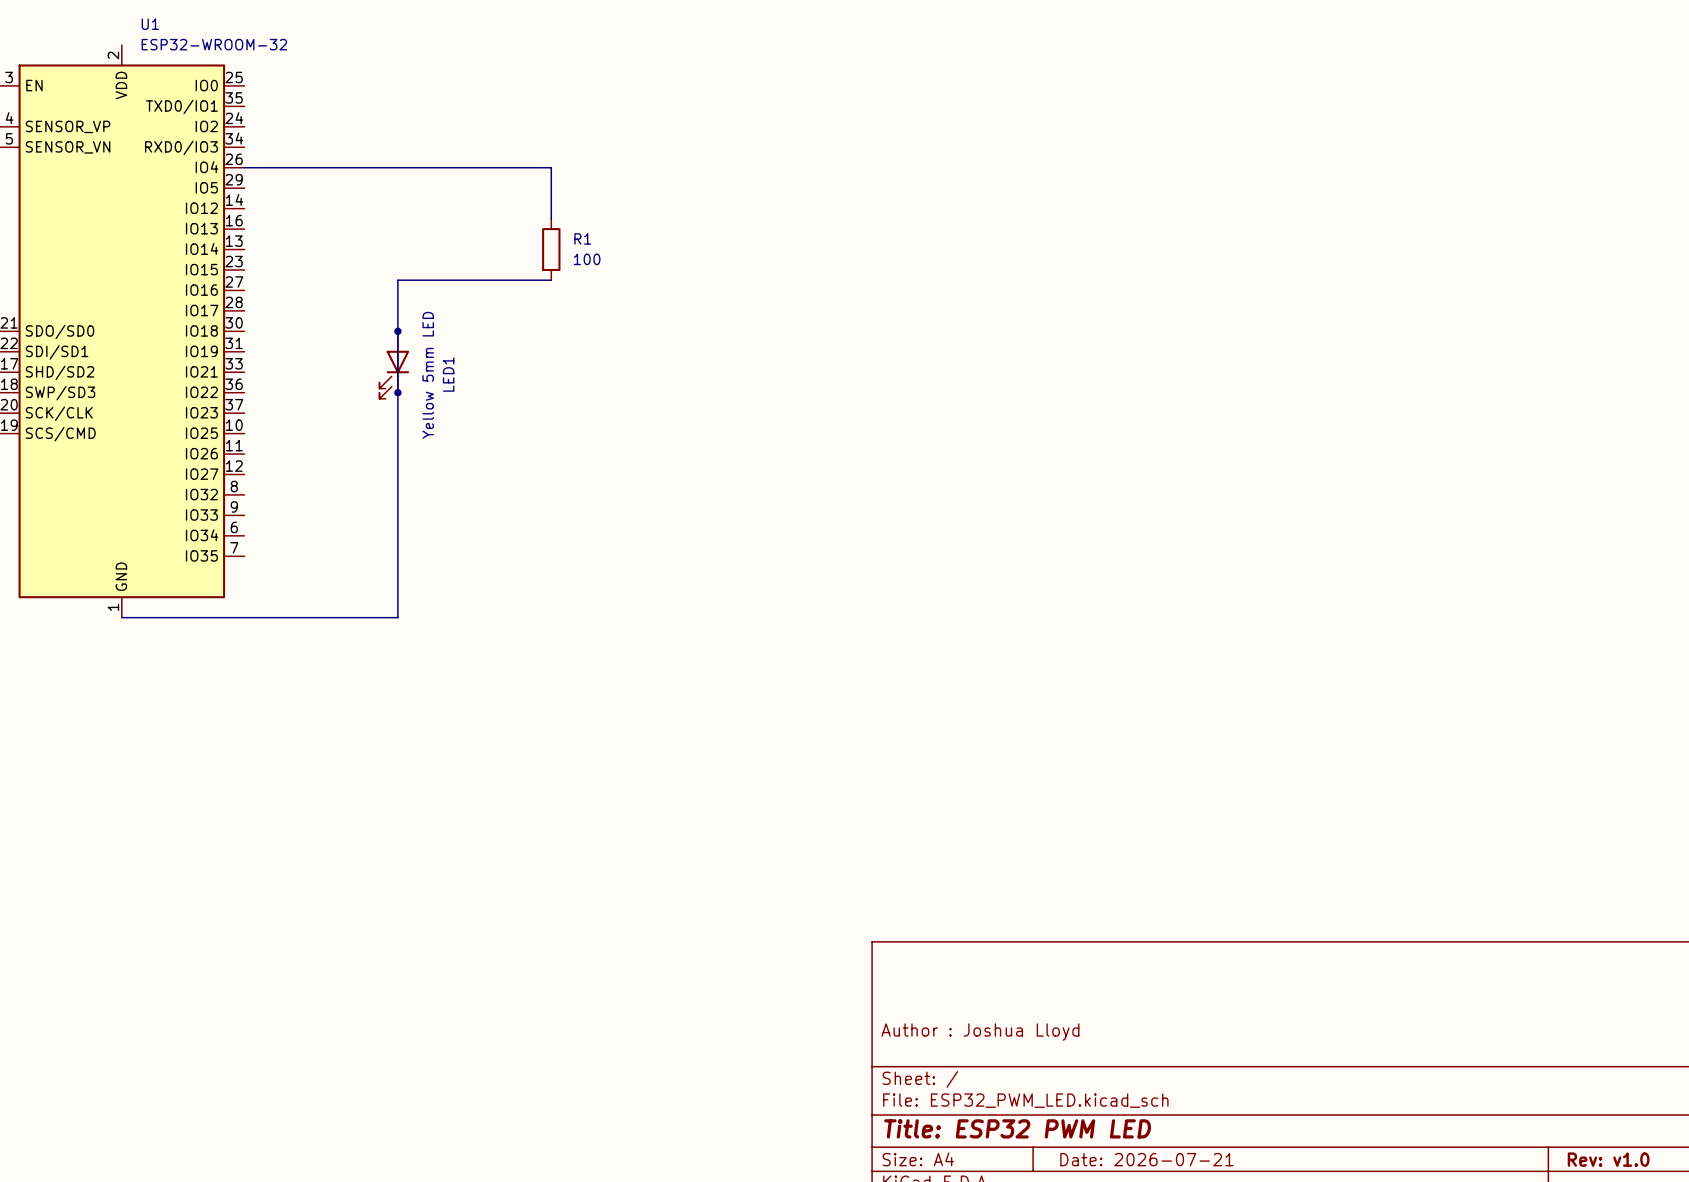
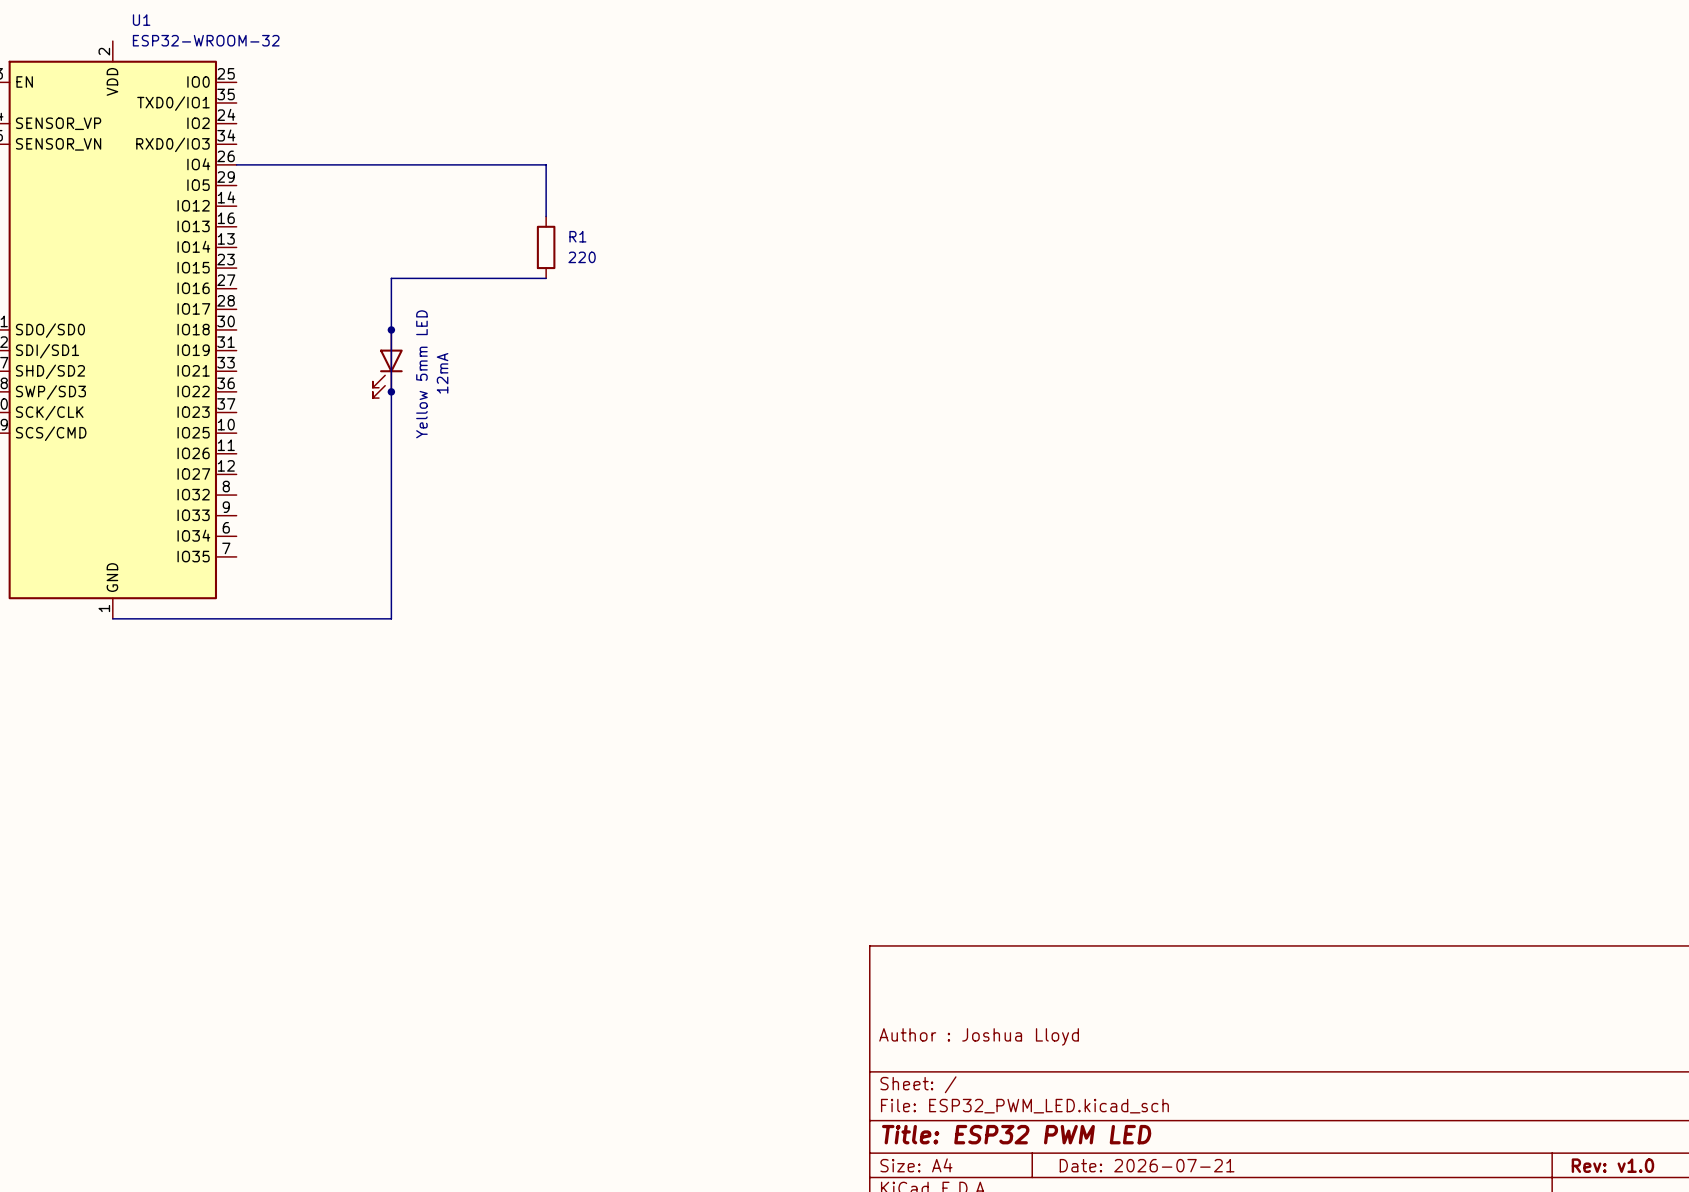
R1 value: 100 (587, 259) -> 220 (582, 257)
LED1 name: LED1 (448, 374) -> 12mA (442, 373)

